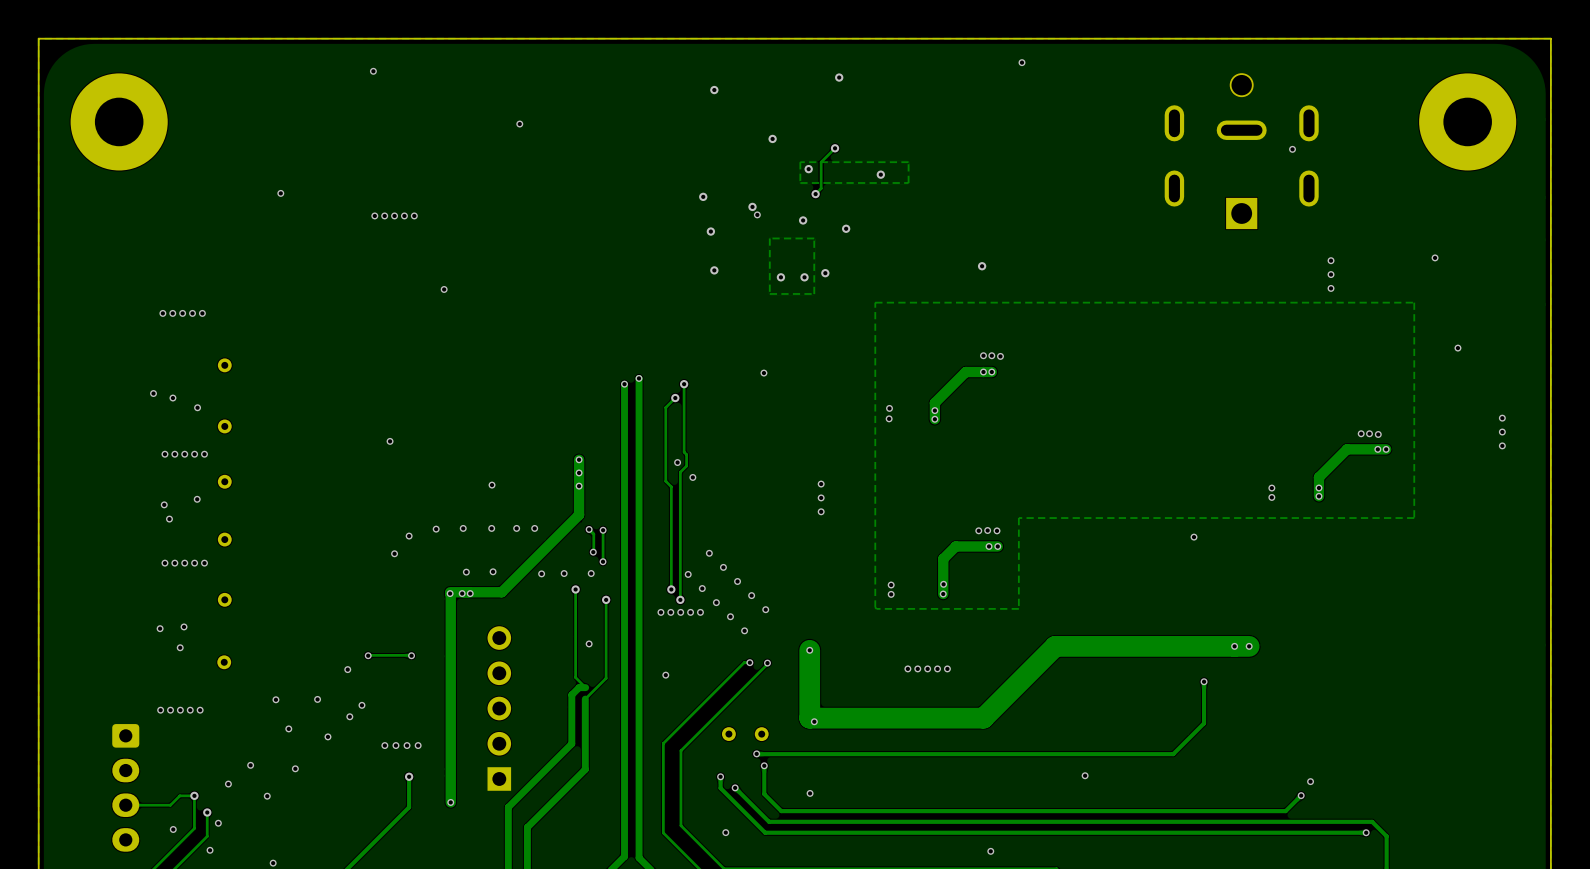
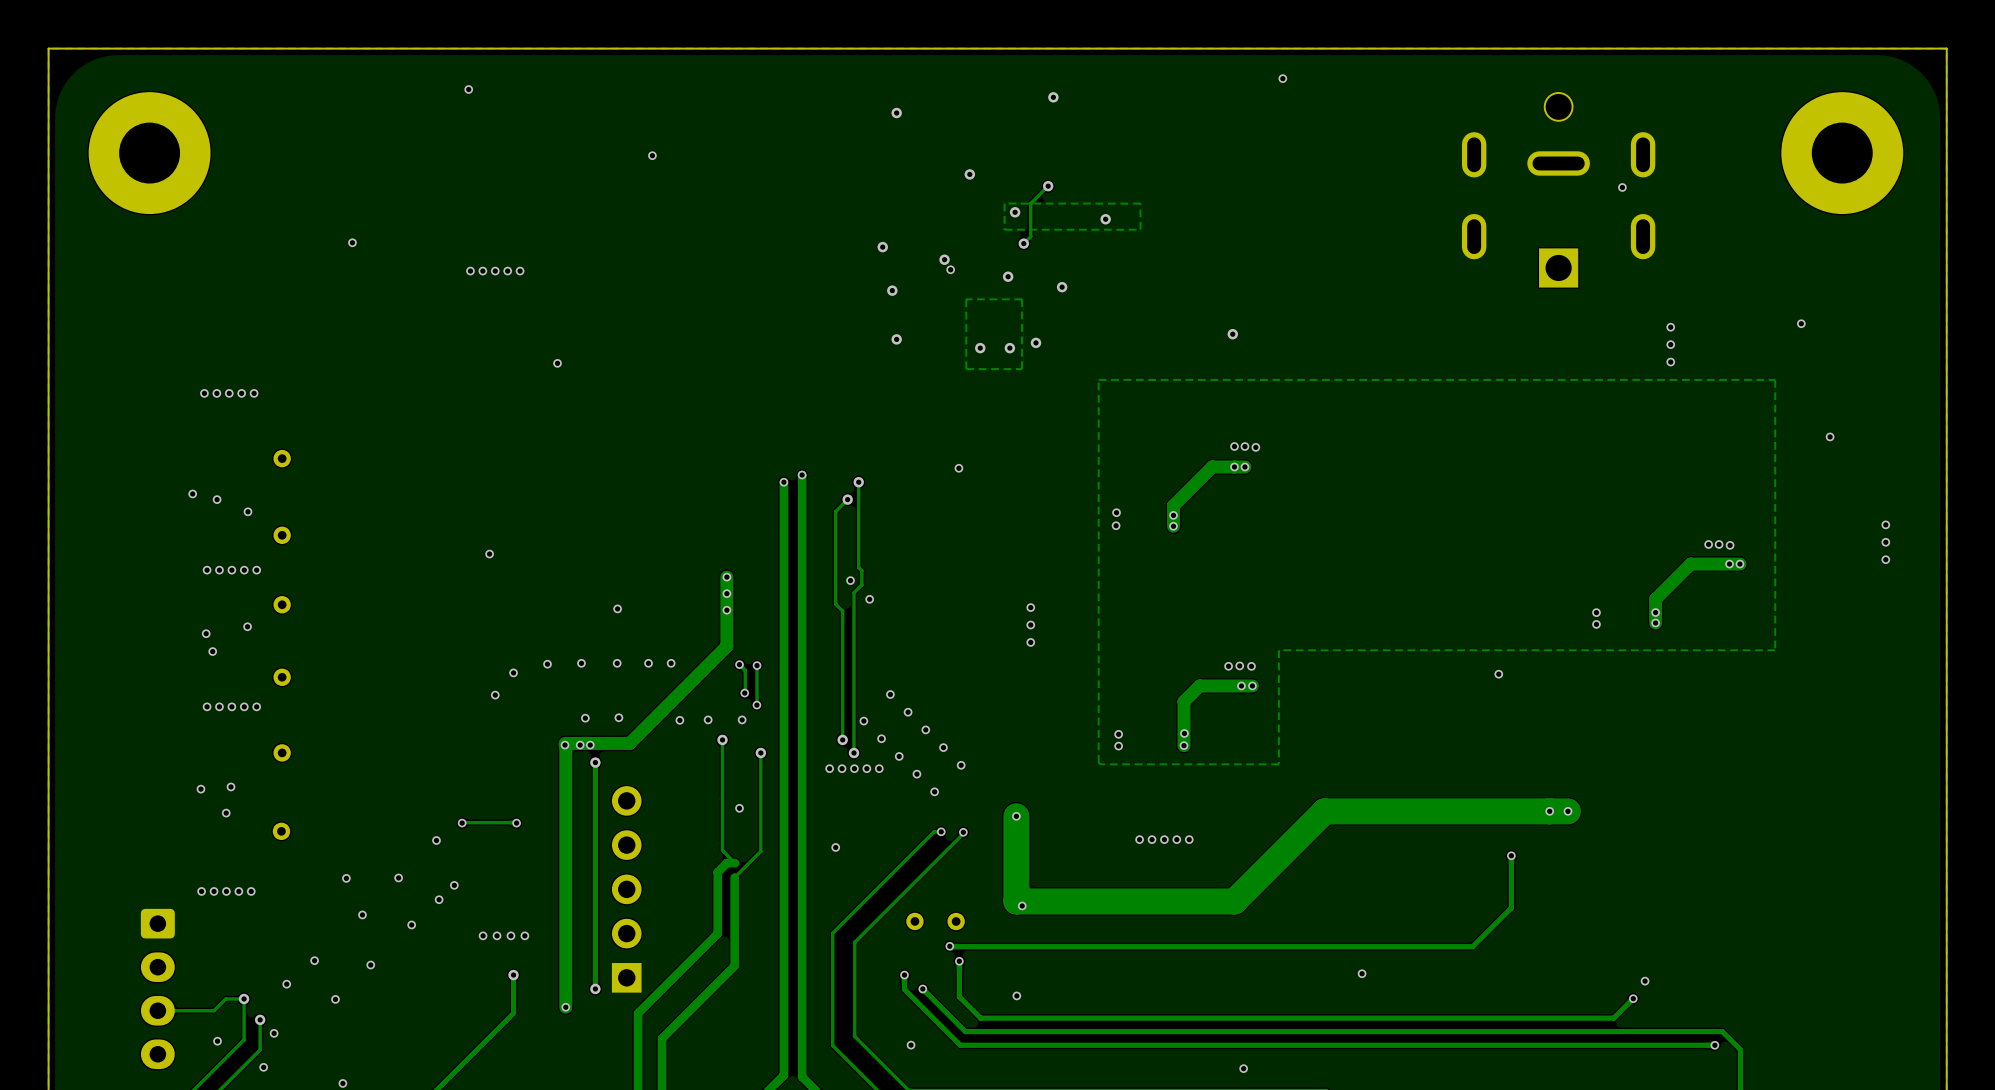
track: none -> (595, 762) (595, 988)
via: none -> (595, 762)
via: none -> (595, 988)

